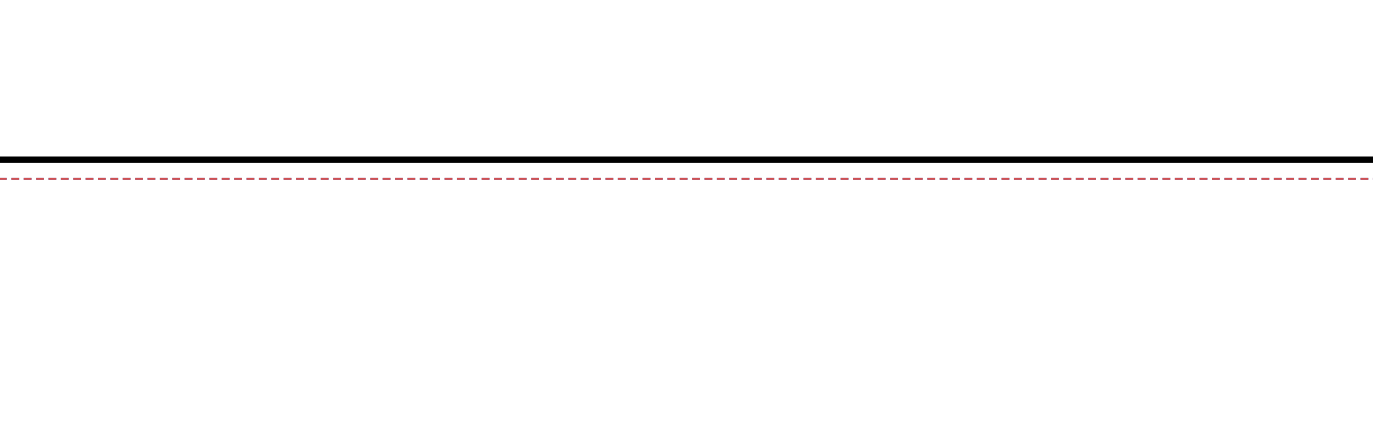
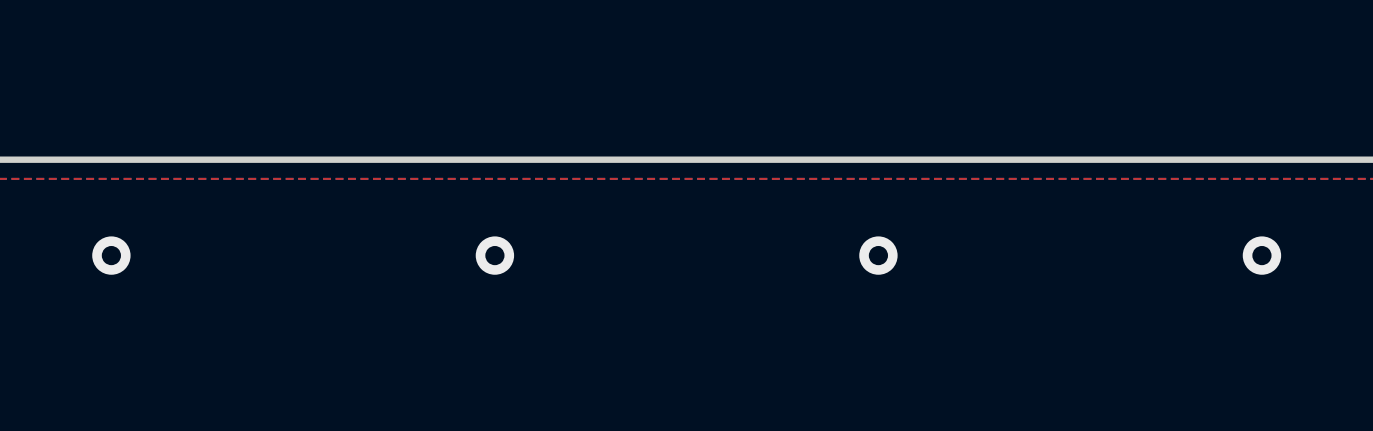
via: none -> (111, 255)
via: none -> (494, 255)
via: none -> (878, 255)
via: none -> (1261, 255)

